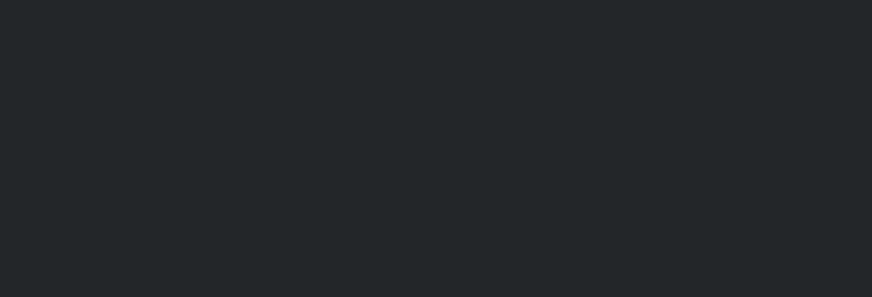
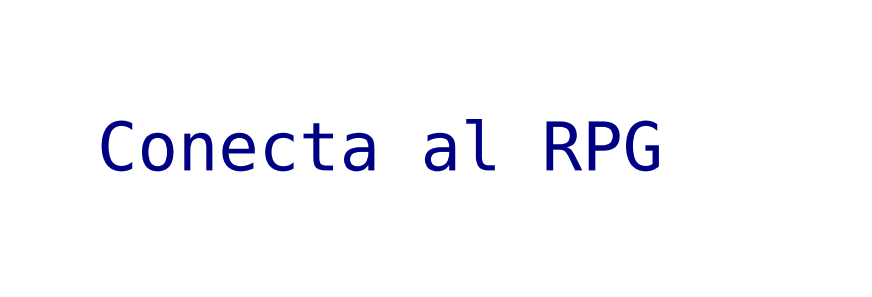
text: none -> Conecta al RPG (380, 145)

